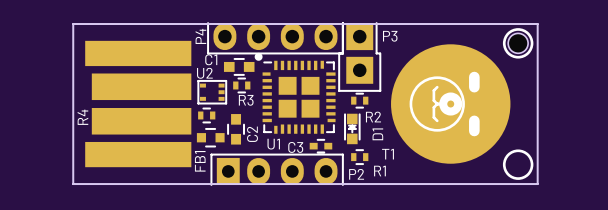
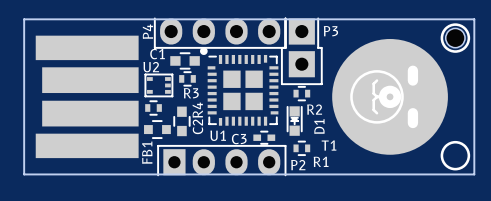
R4 name position: R4 (82, 117) -> R4 (197, 110)

